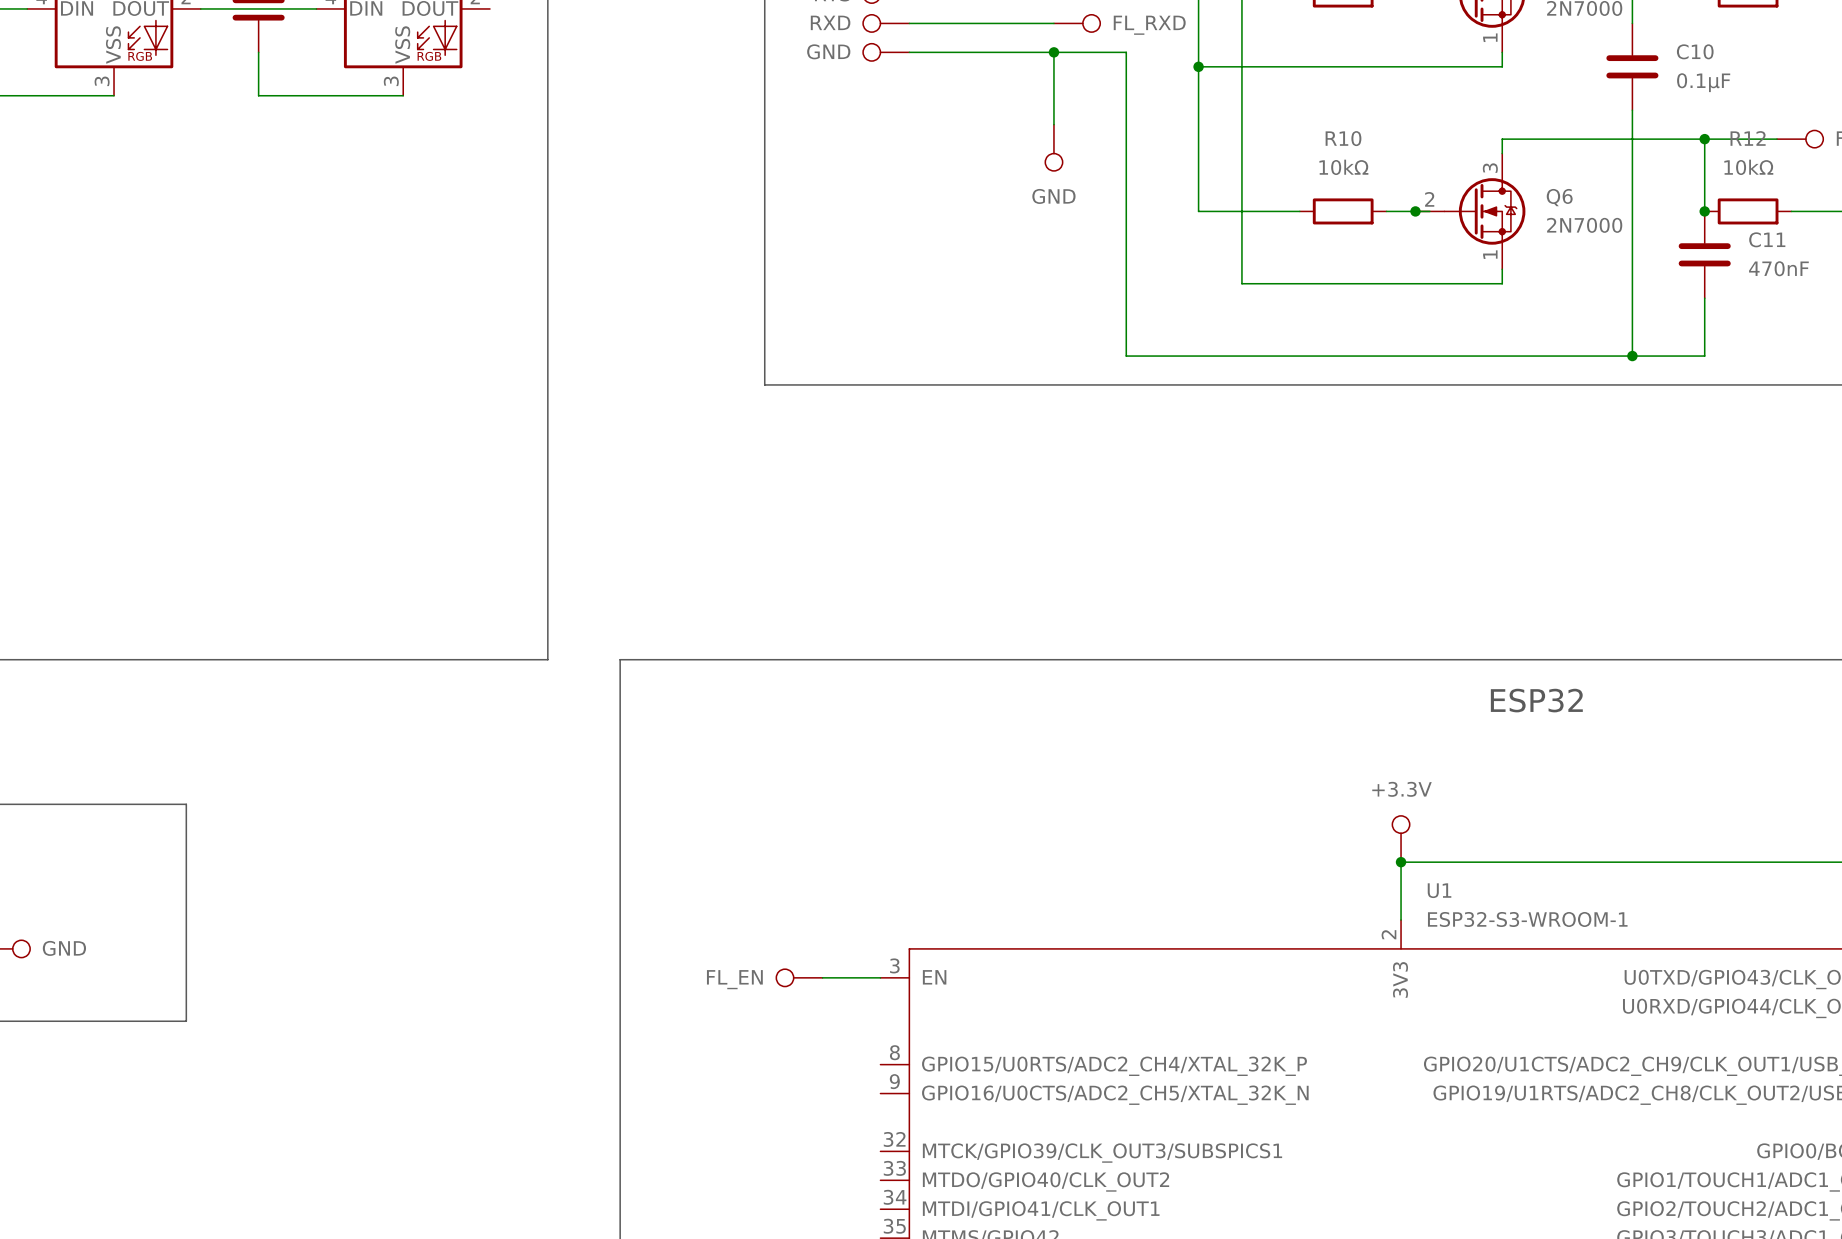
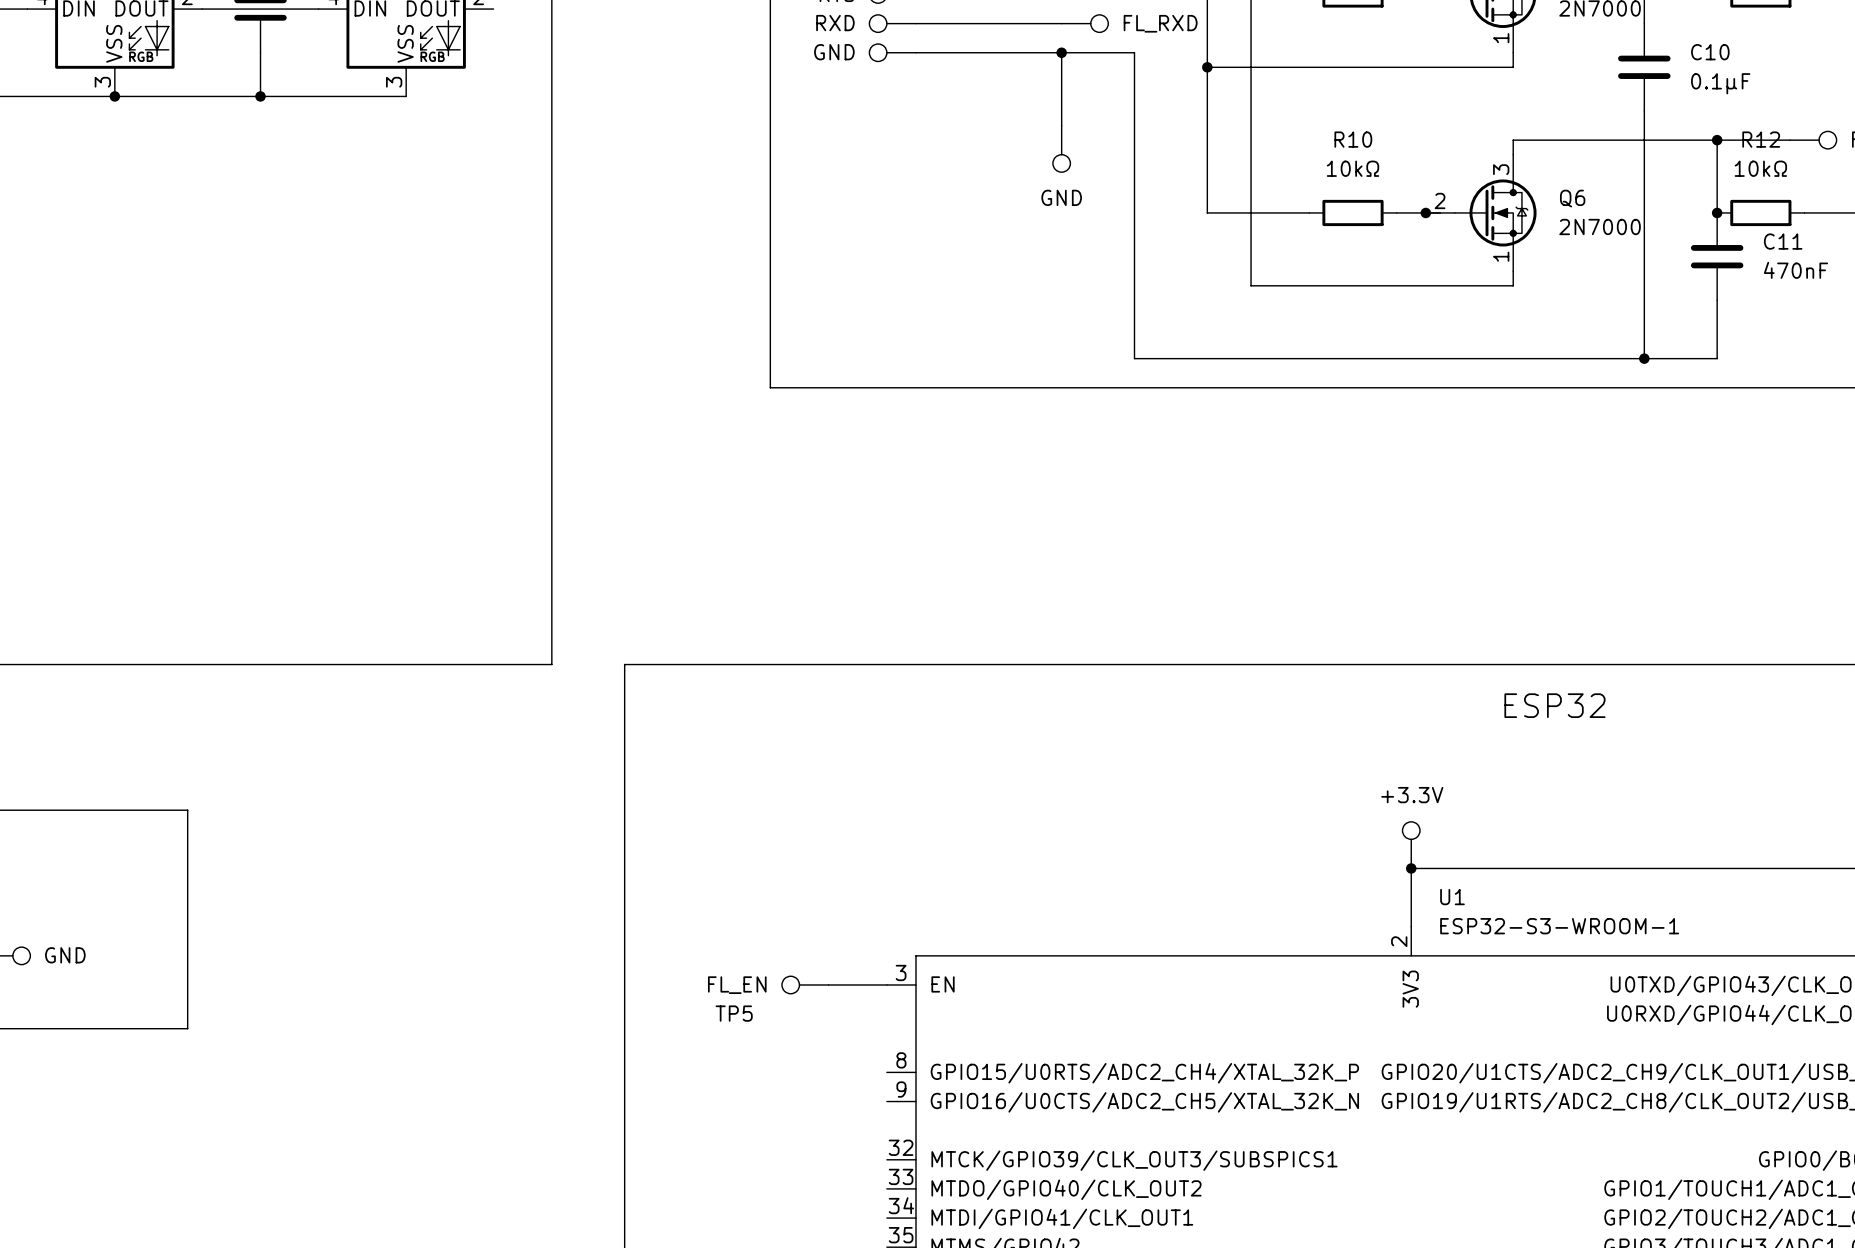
wire: none -> (114, 96) (260, 96)
junction: none -> (114, 96)
junction: none -> (260, 96)
TP5 name: none -> TP5 (734, 1013)

